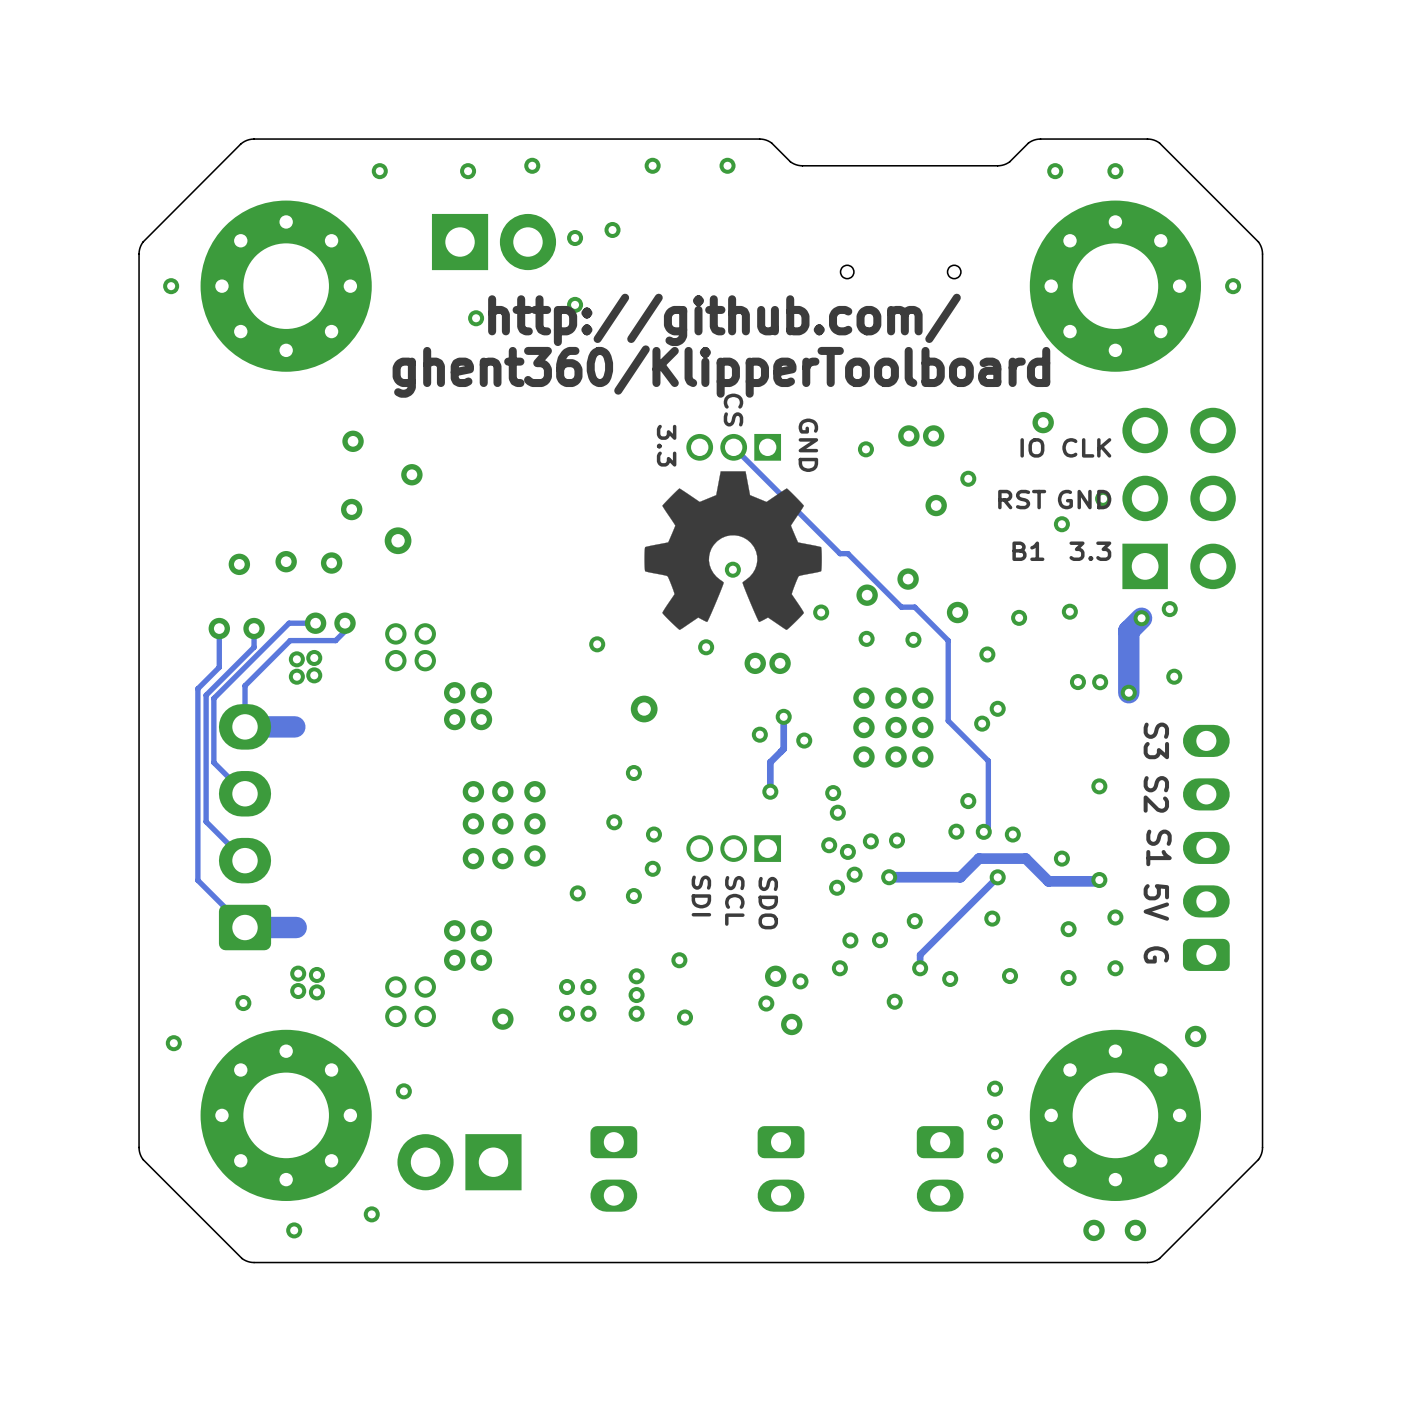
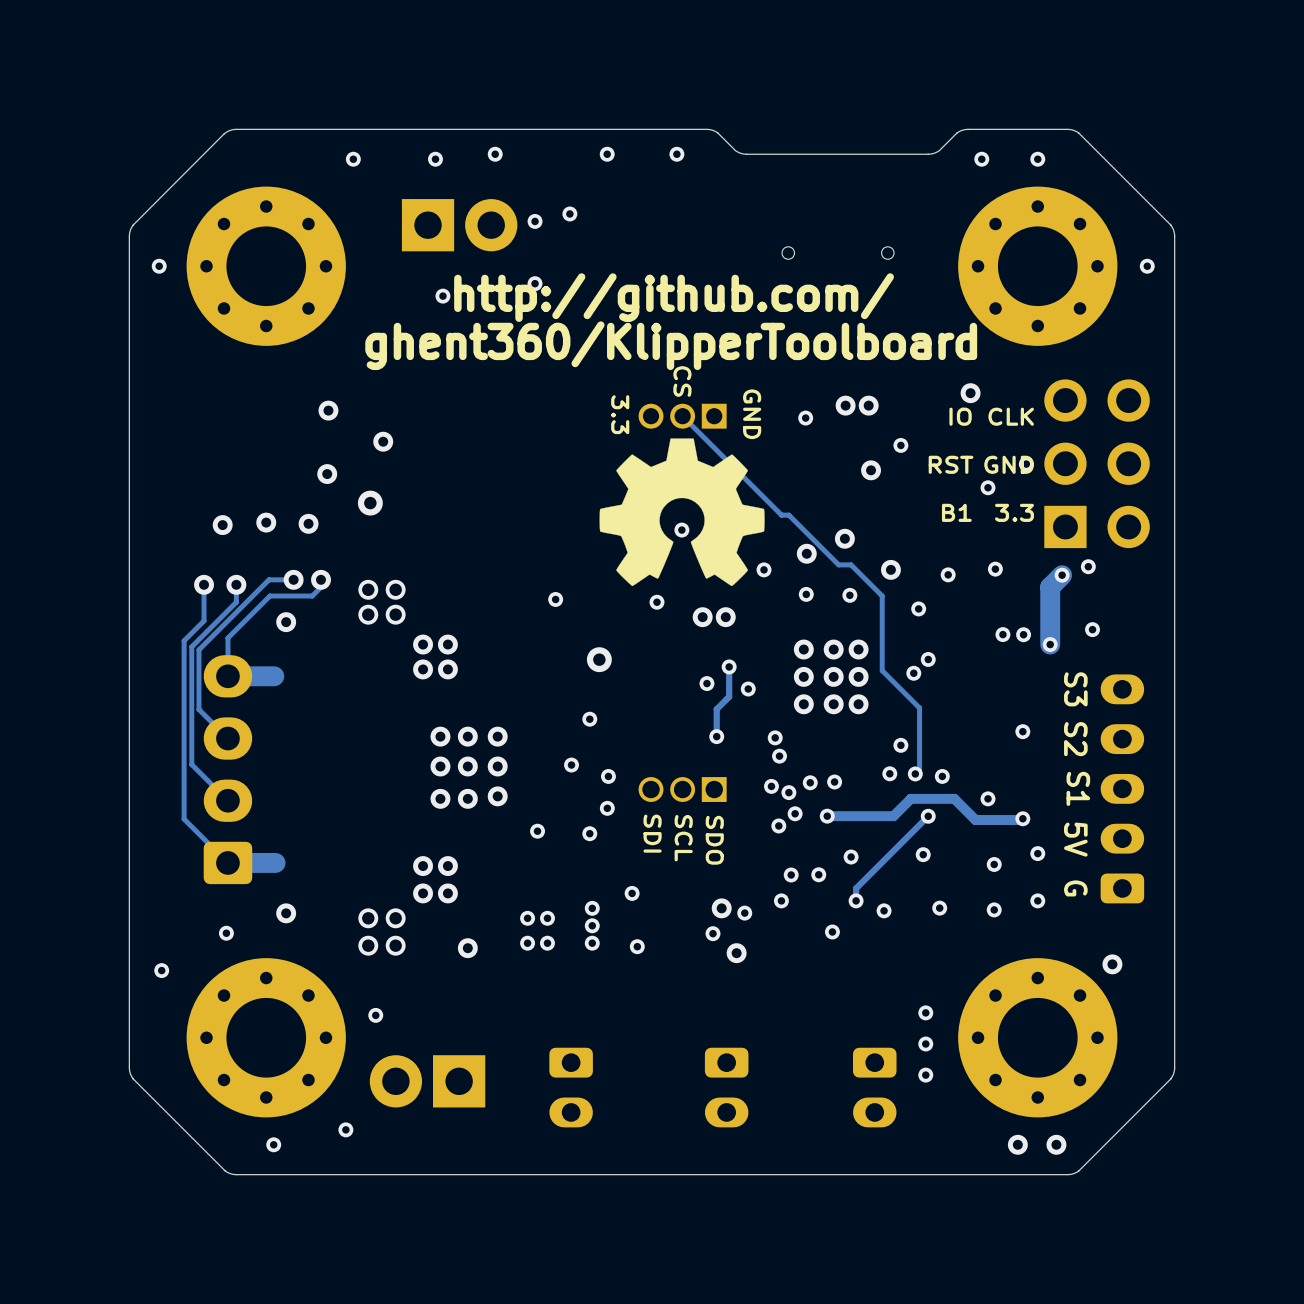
via: (314, 657) -> none
via: (296, 659) -> none
via: none -> (286, 622)
via: (314, 675) -> none
via: (296, 676) -> none
via: (298, 973) -> none
via: (316, 974) -> none
via: none -> (286, 913)
via: (298, 991) -> none
via: (316, 992) -> none

